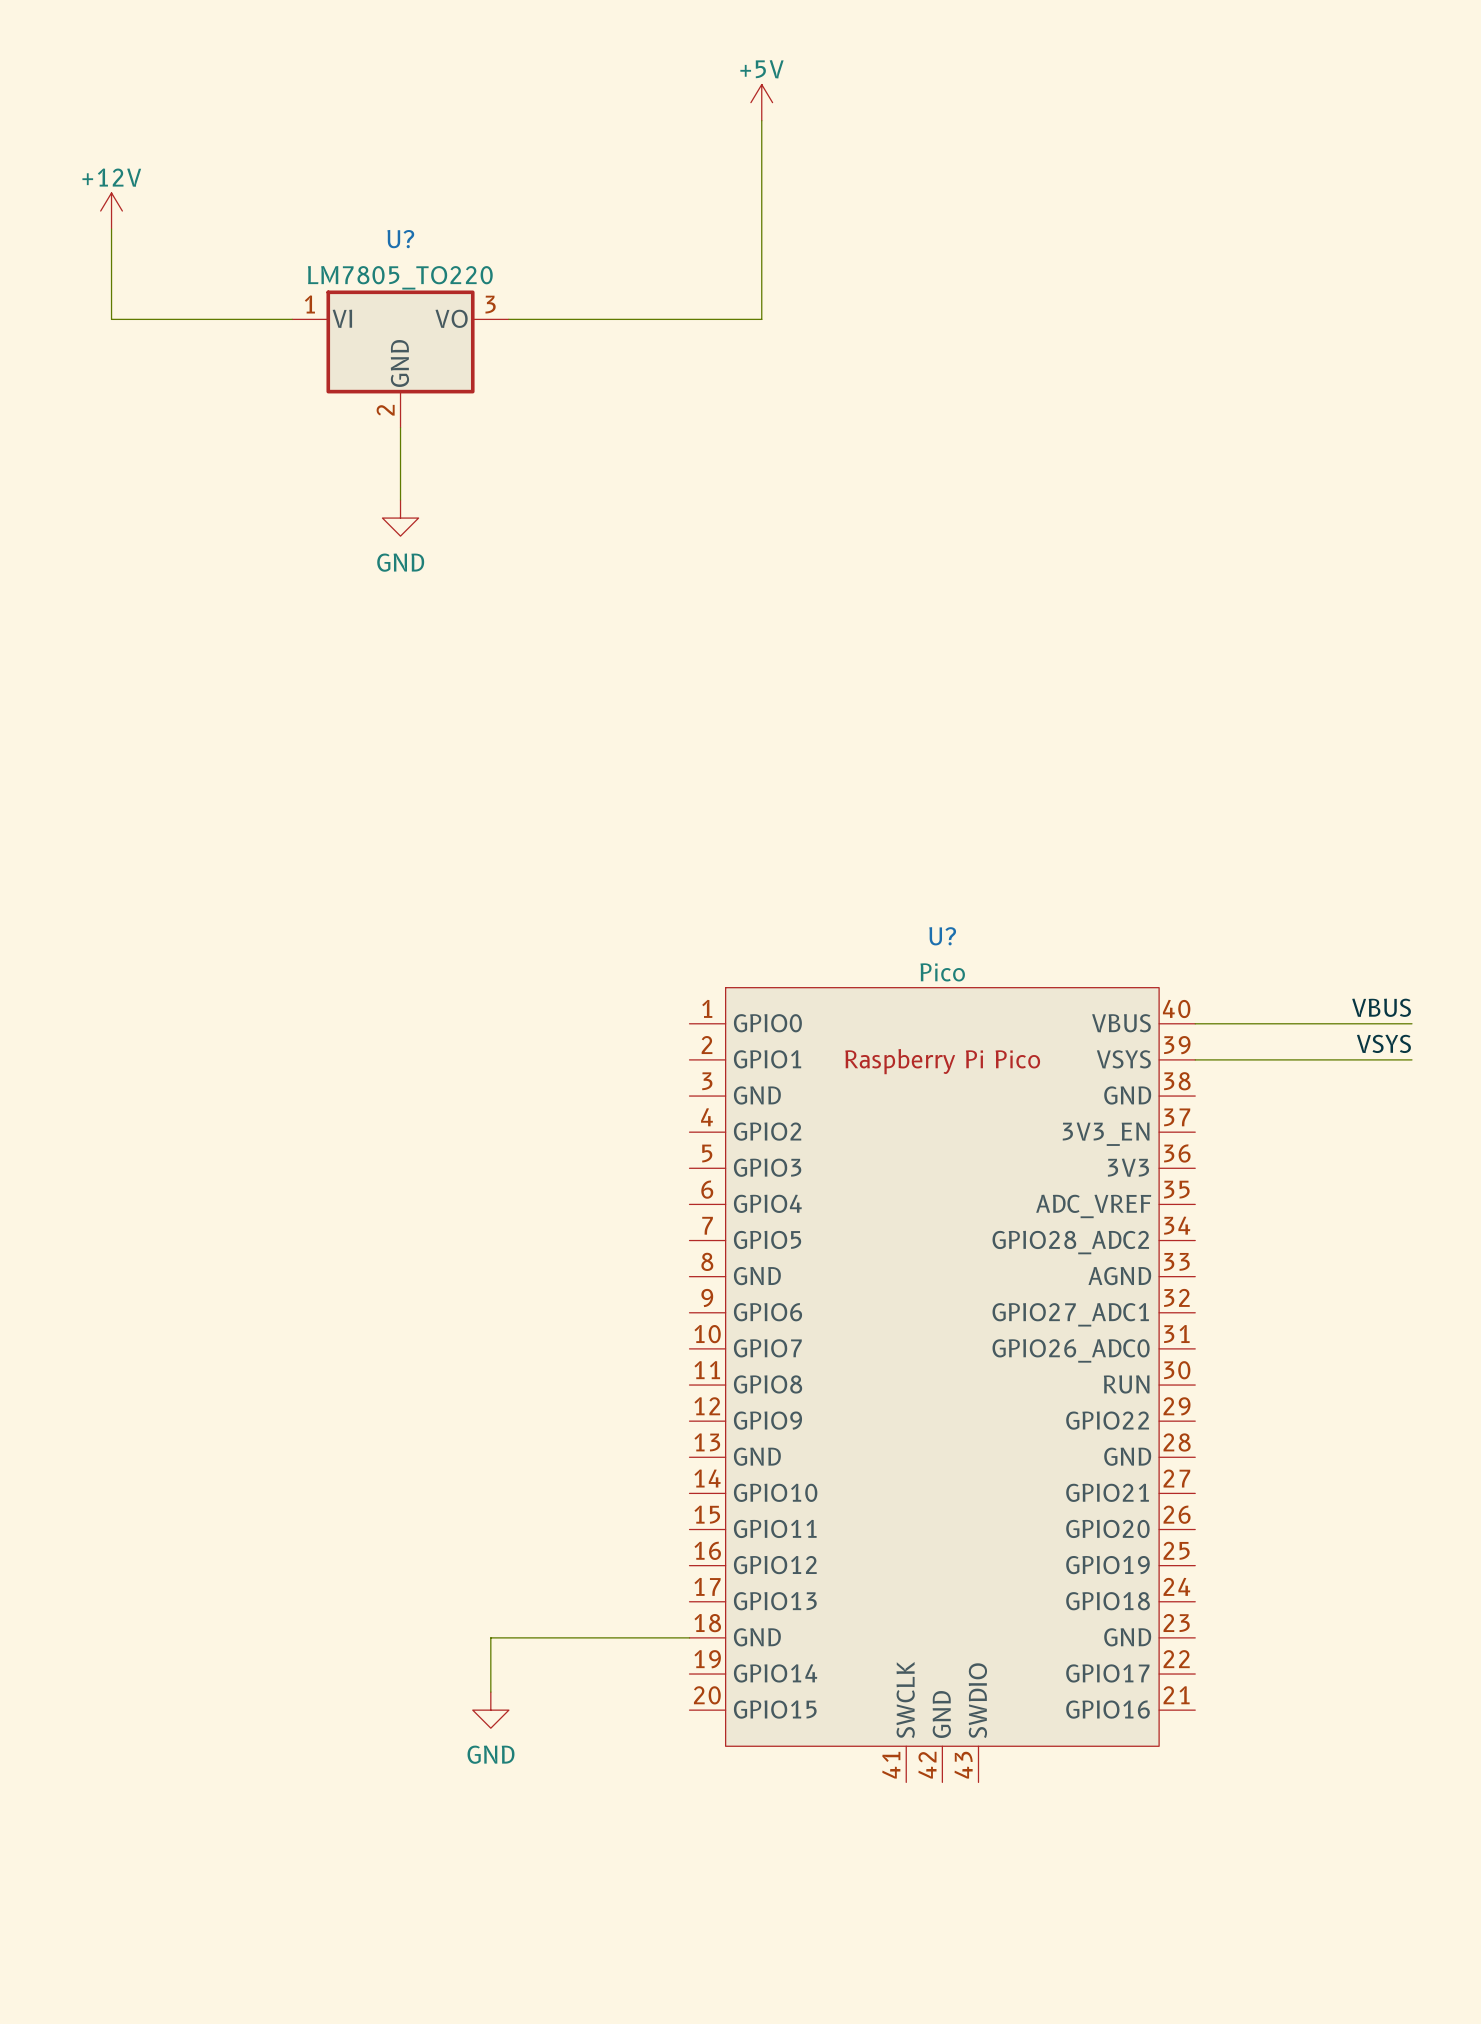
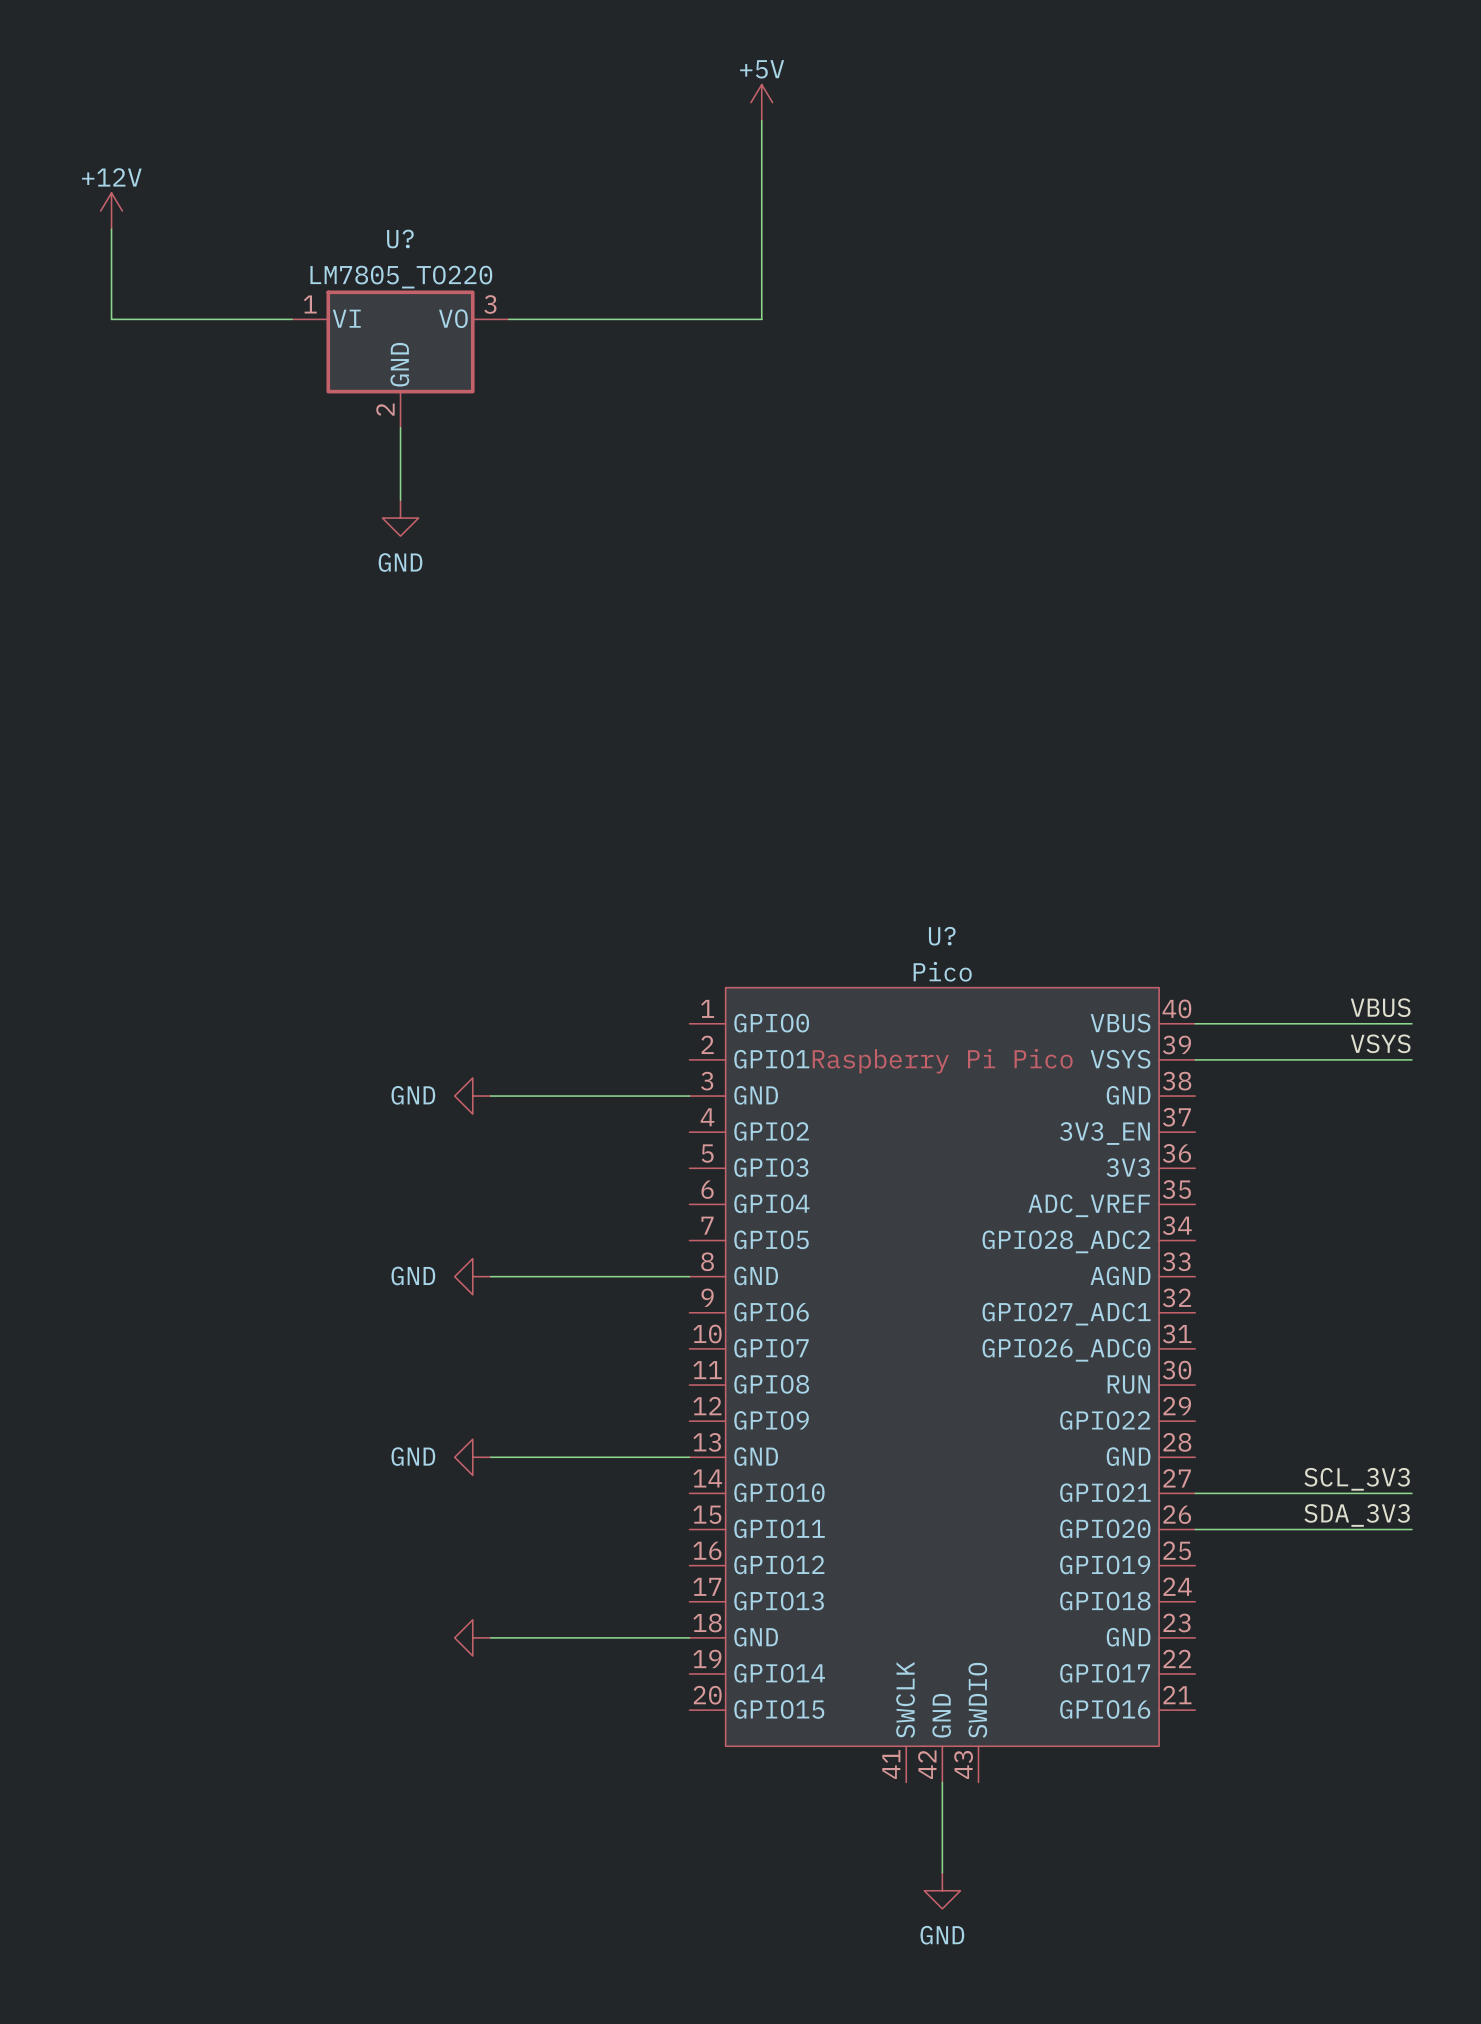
power symbol: none -> GND (472, 1096)
wire: none -> (490, 1096) (689, 1096)
power symbol: none -> GND (472, 1276)
wire: none -> (490, 1276) (689, 1276)
power symbol: none -> GND (472, 1457)
wire: none -> (490, 1457) (689, 1457)
label: none -> SCL_3V3 (1357, 1479)
wire: none -> (1195, 1493) (1411, 1493)
label: none -> SDA_3V3 (1357, 1515)
wire: none -> (1195, 1529) (1411, 1529)
power symbol: none -> (472, 1637)
wire: (490, 1637) (490, 1692) -> none
power symbol: GND (490, 1710) -> none
wire: none -> (942, 1782) (942, 1872)
power symbol: none -> GND (942, 1890)

